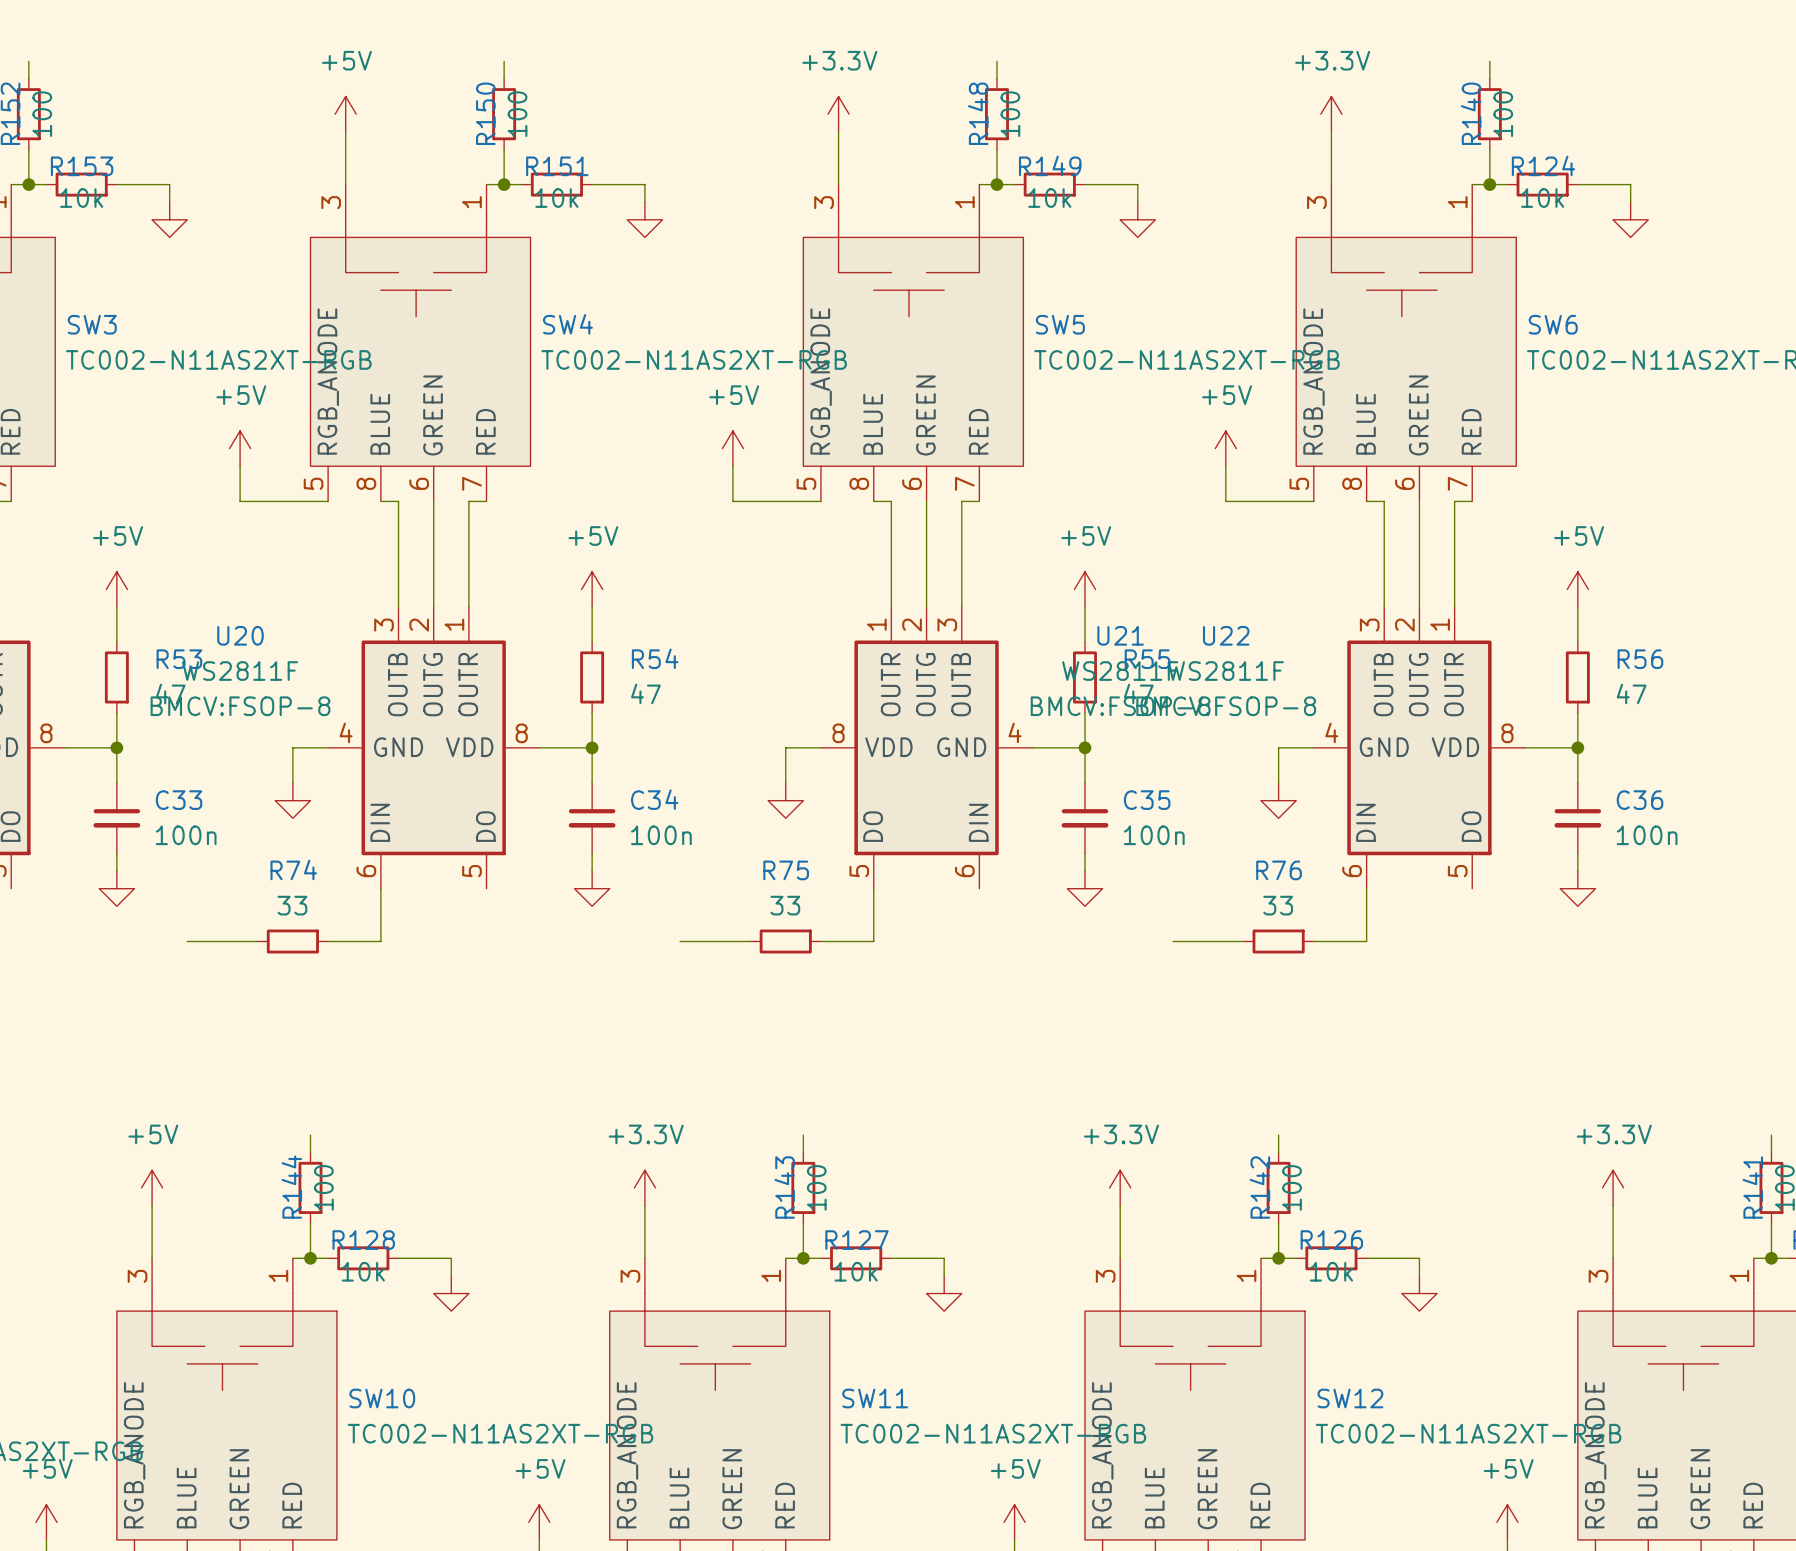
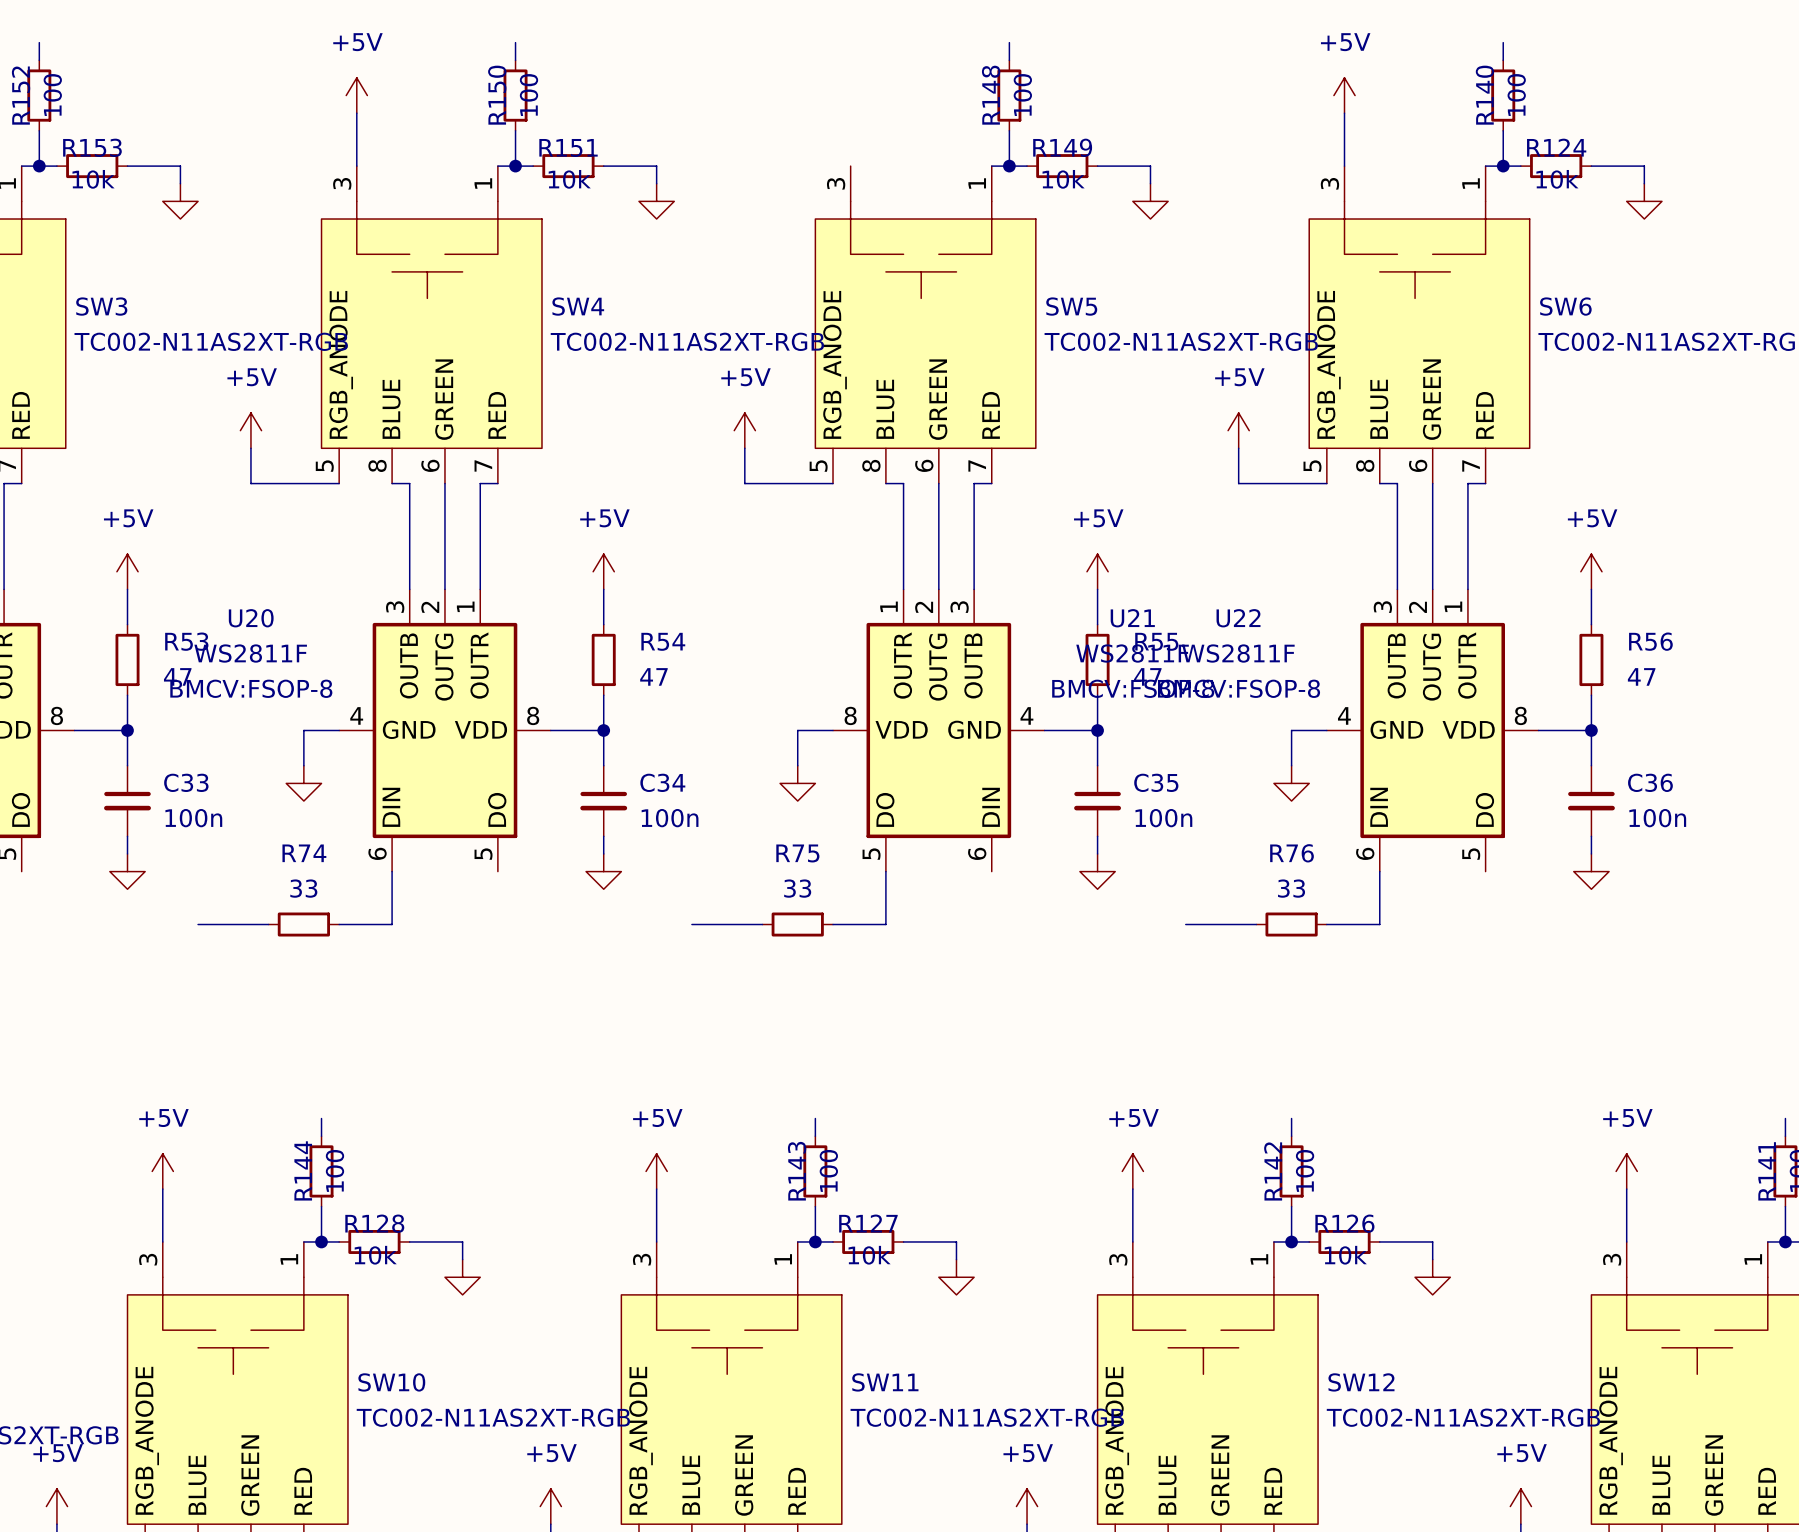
power symbol: +3.3V (838, 114) -> none
power symbol: +3.3V (1331, 114) -> +5V (1344, 95)
wire: (838, 131) (838, 184) -> none
power symbol: +3.3V (644, 1187) -> +5V (656, 1171)
power symbol: +3.3V (1120, 1187) -> +5V (1132, 1171)
power symbol: +3.3V (1613, 1187) -> +5V (1626, 1171)

